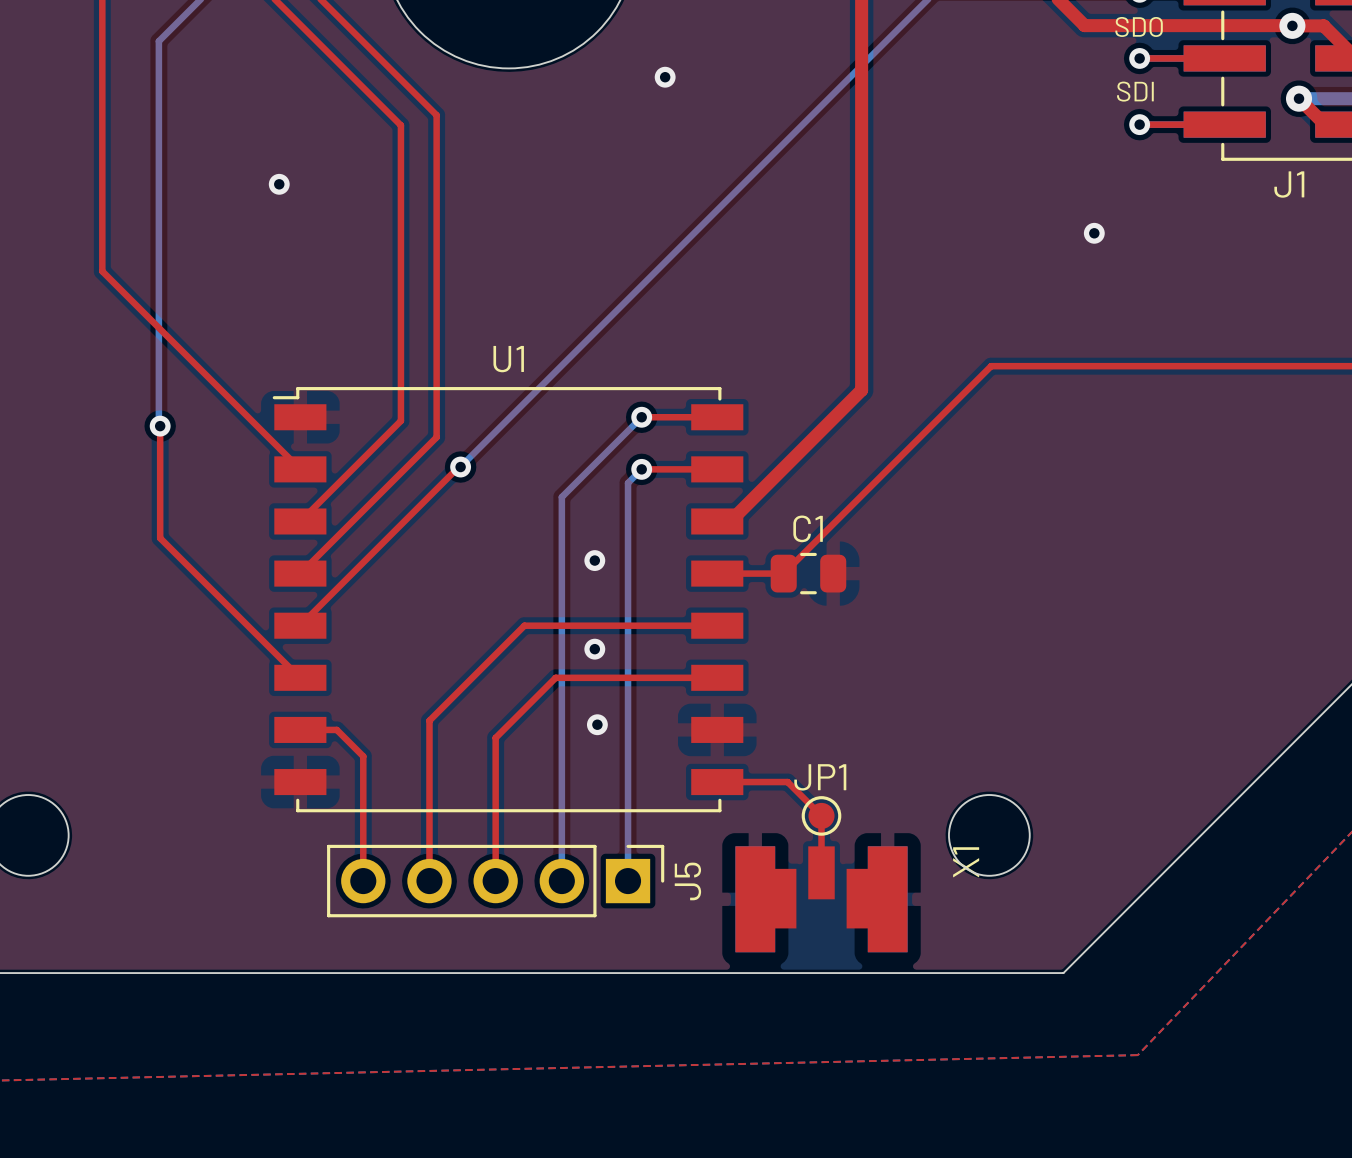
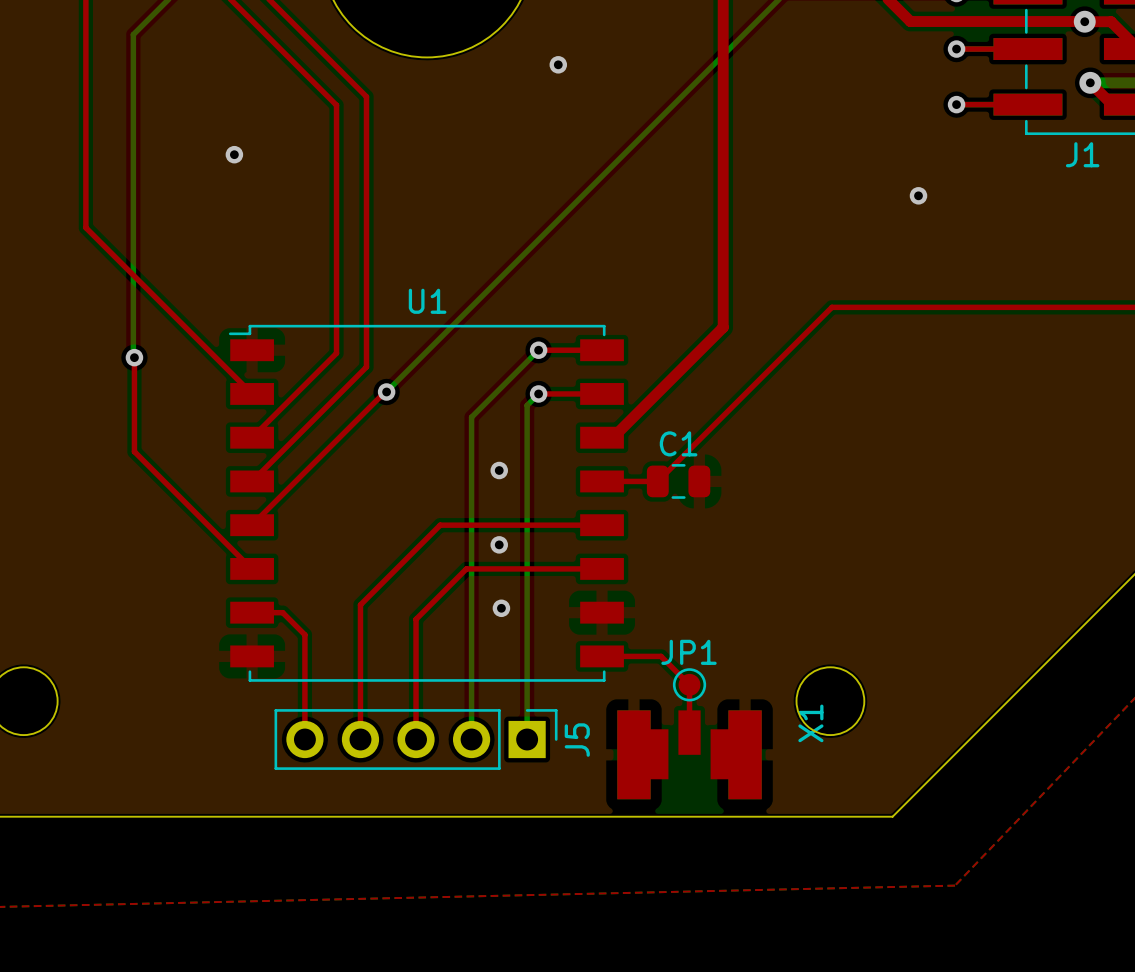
text: SDO (1139, 26) -> none
text: SDI (1135, 91) -> none

